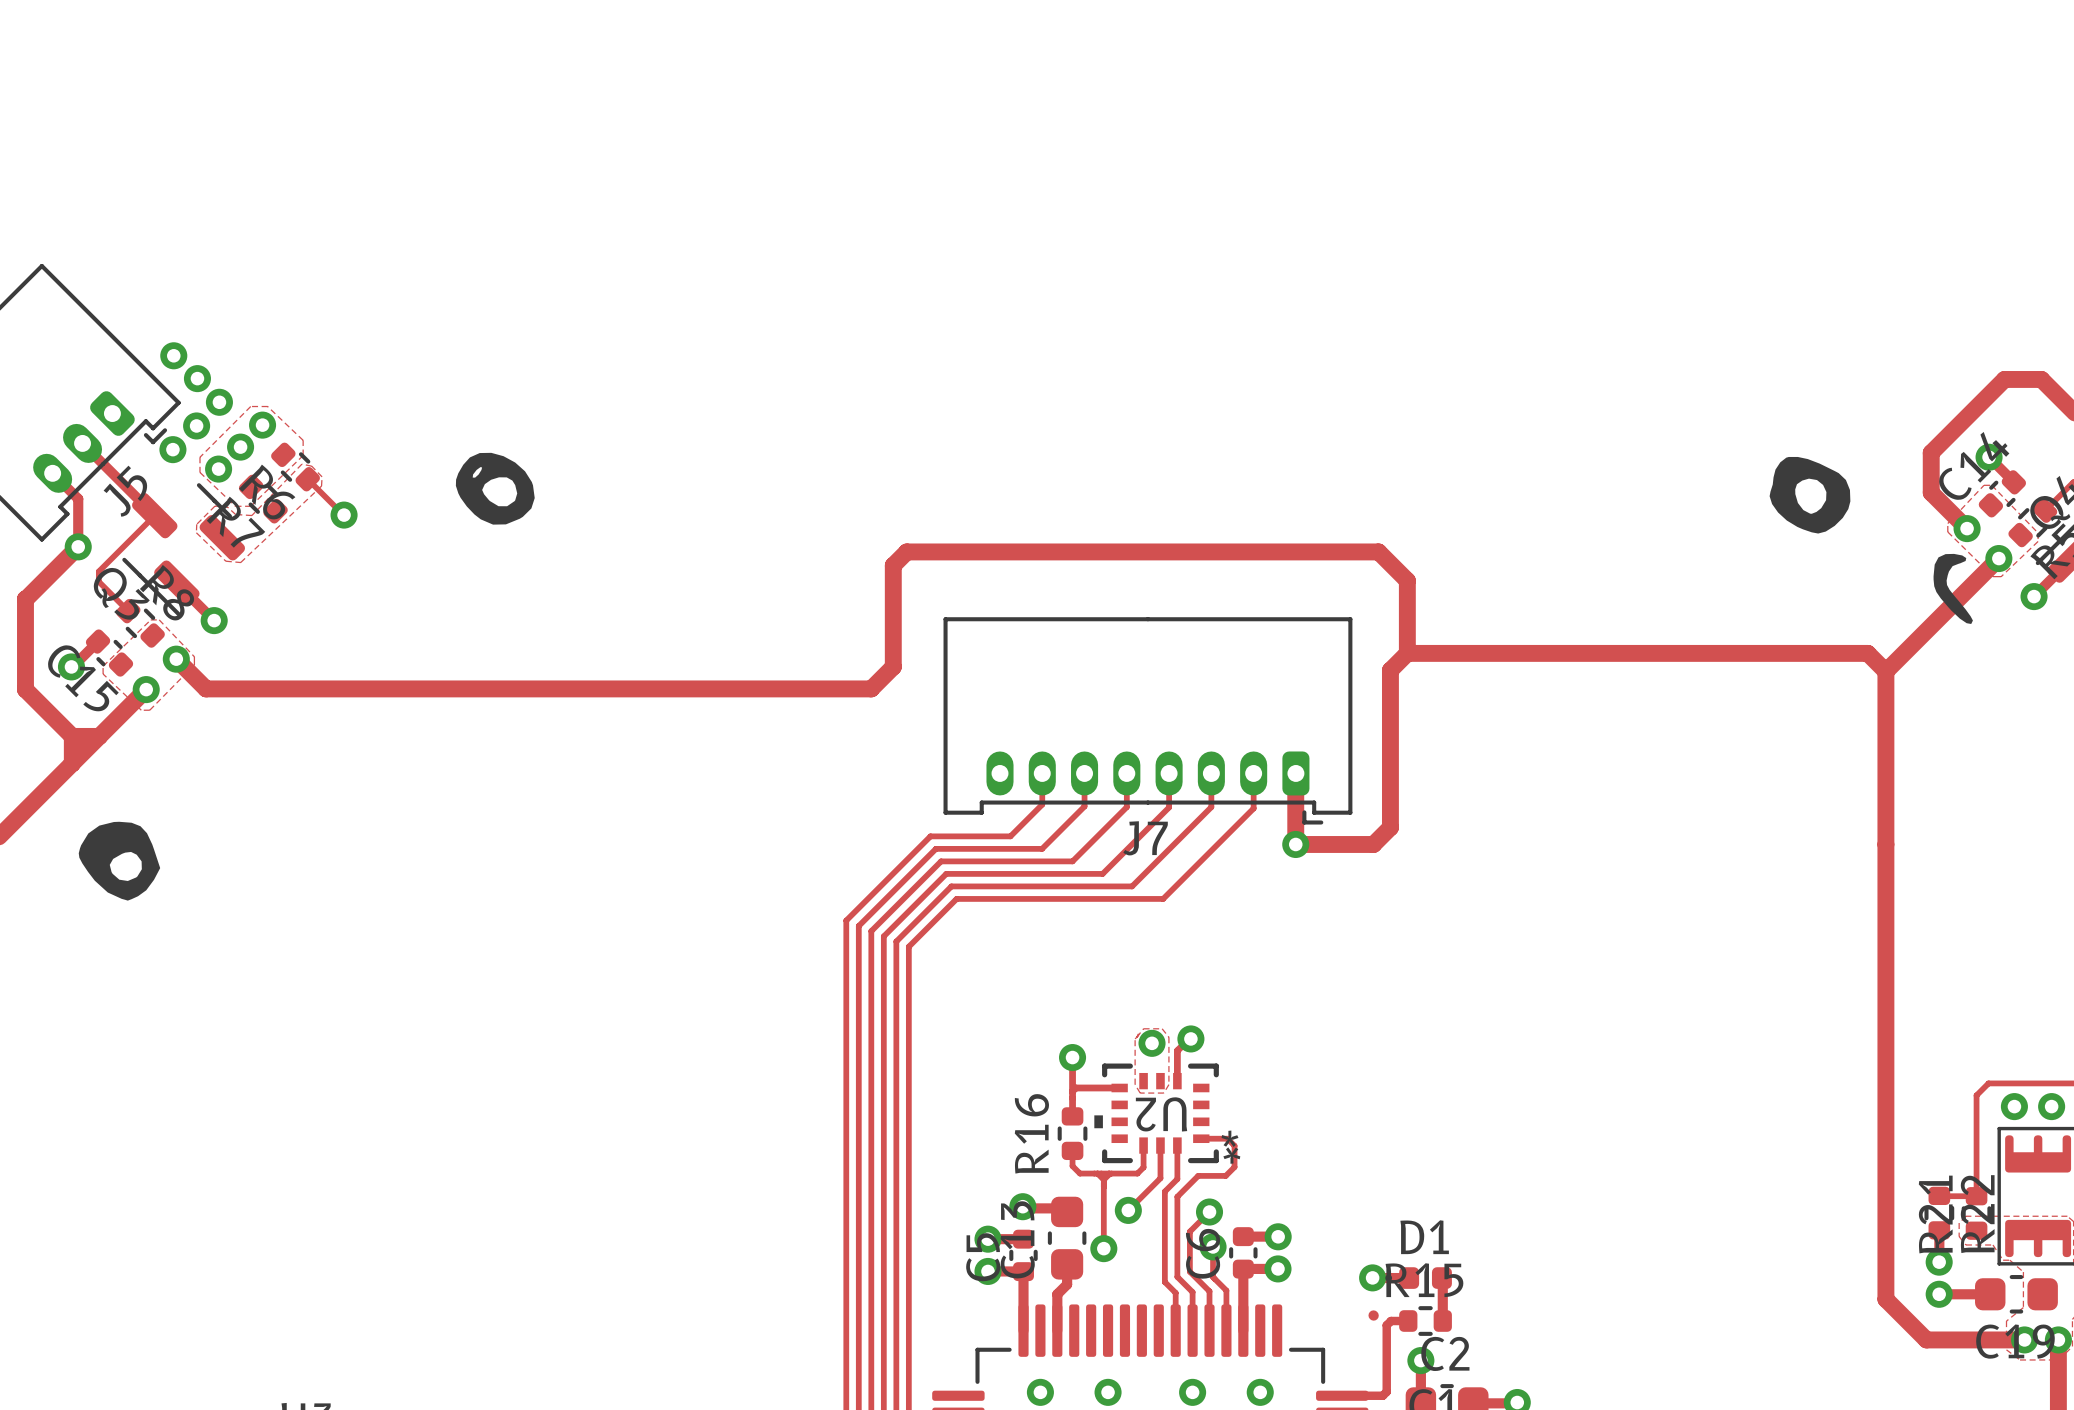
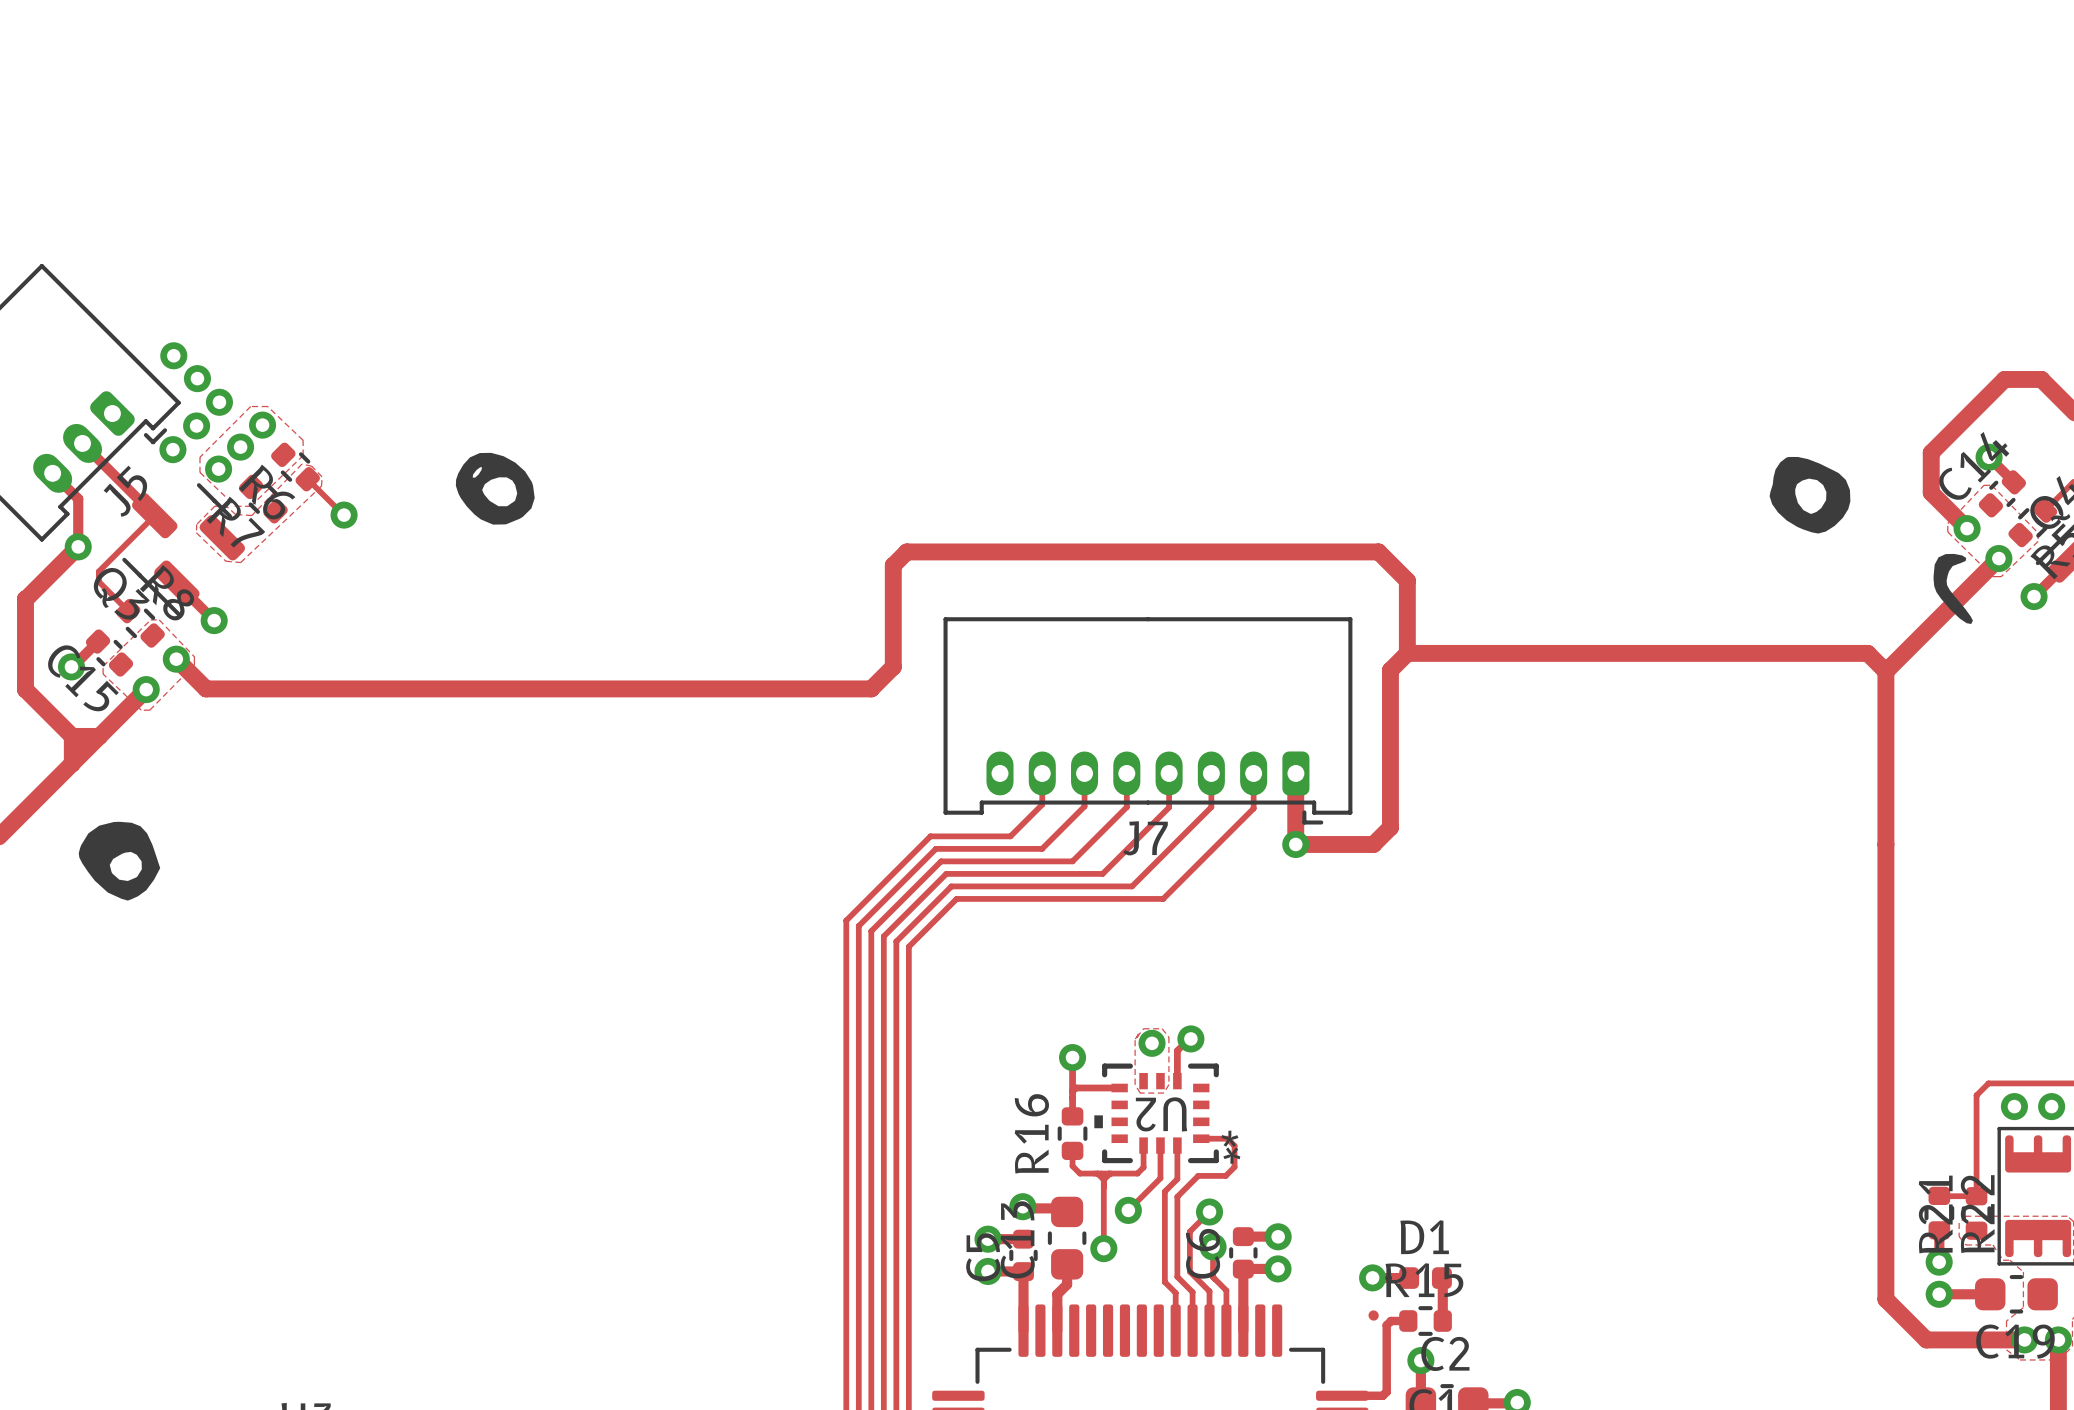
via: (1040, 1392) -> none
via: (1108, 1392) -> none
via: (1192, 1392) -> none
via: (1260, 1392) -> none

